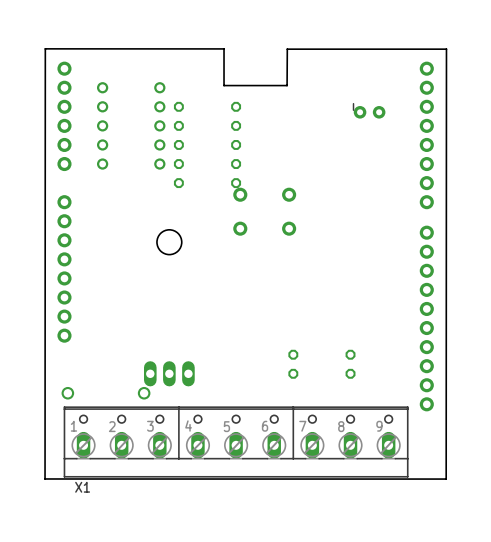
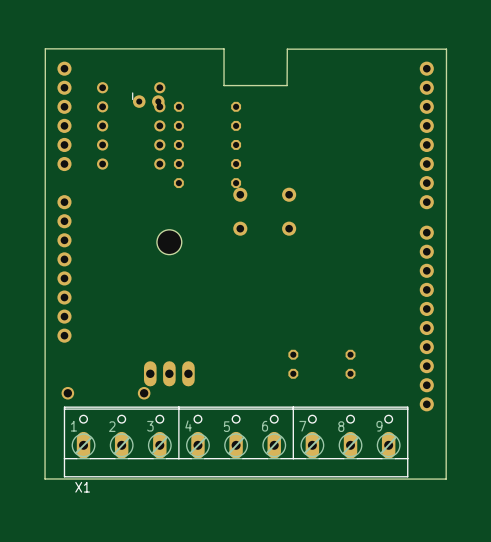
part: none -> (148, 101)
part: (369, 112) -> none

